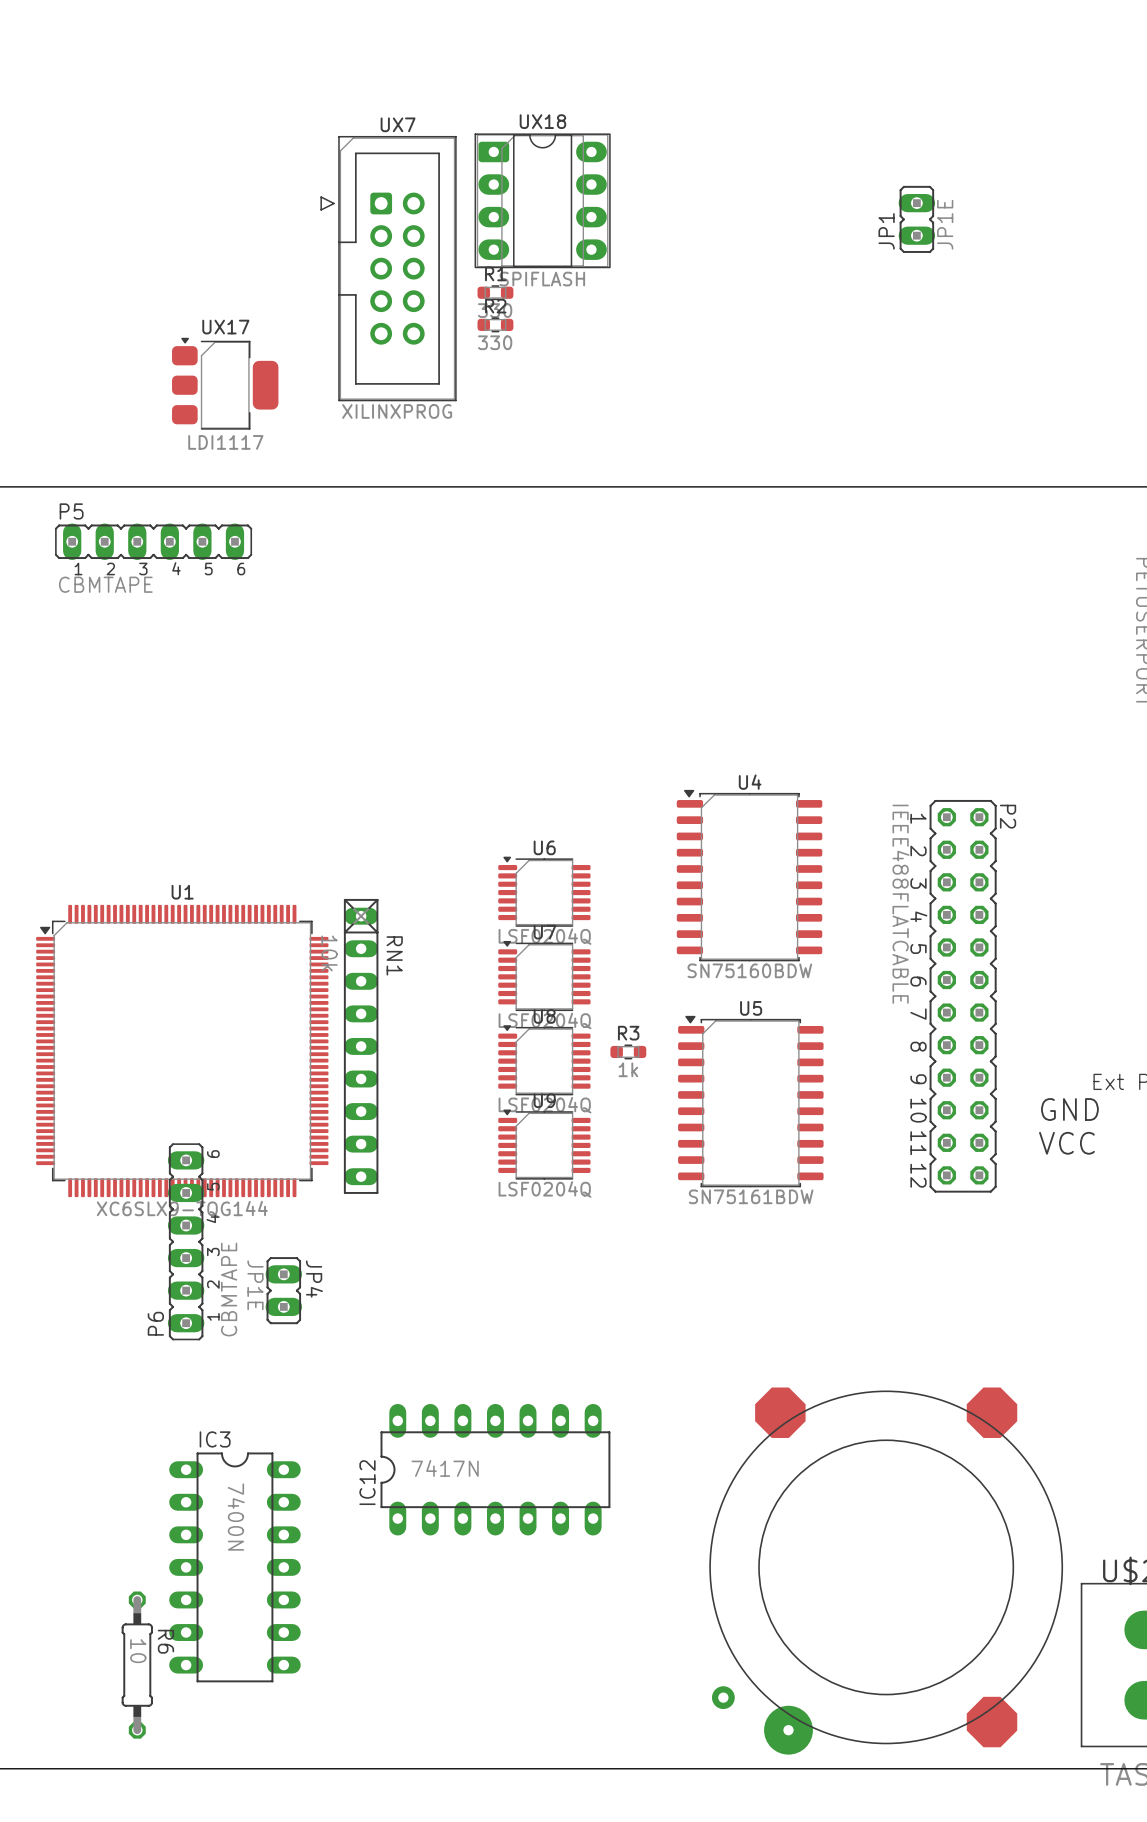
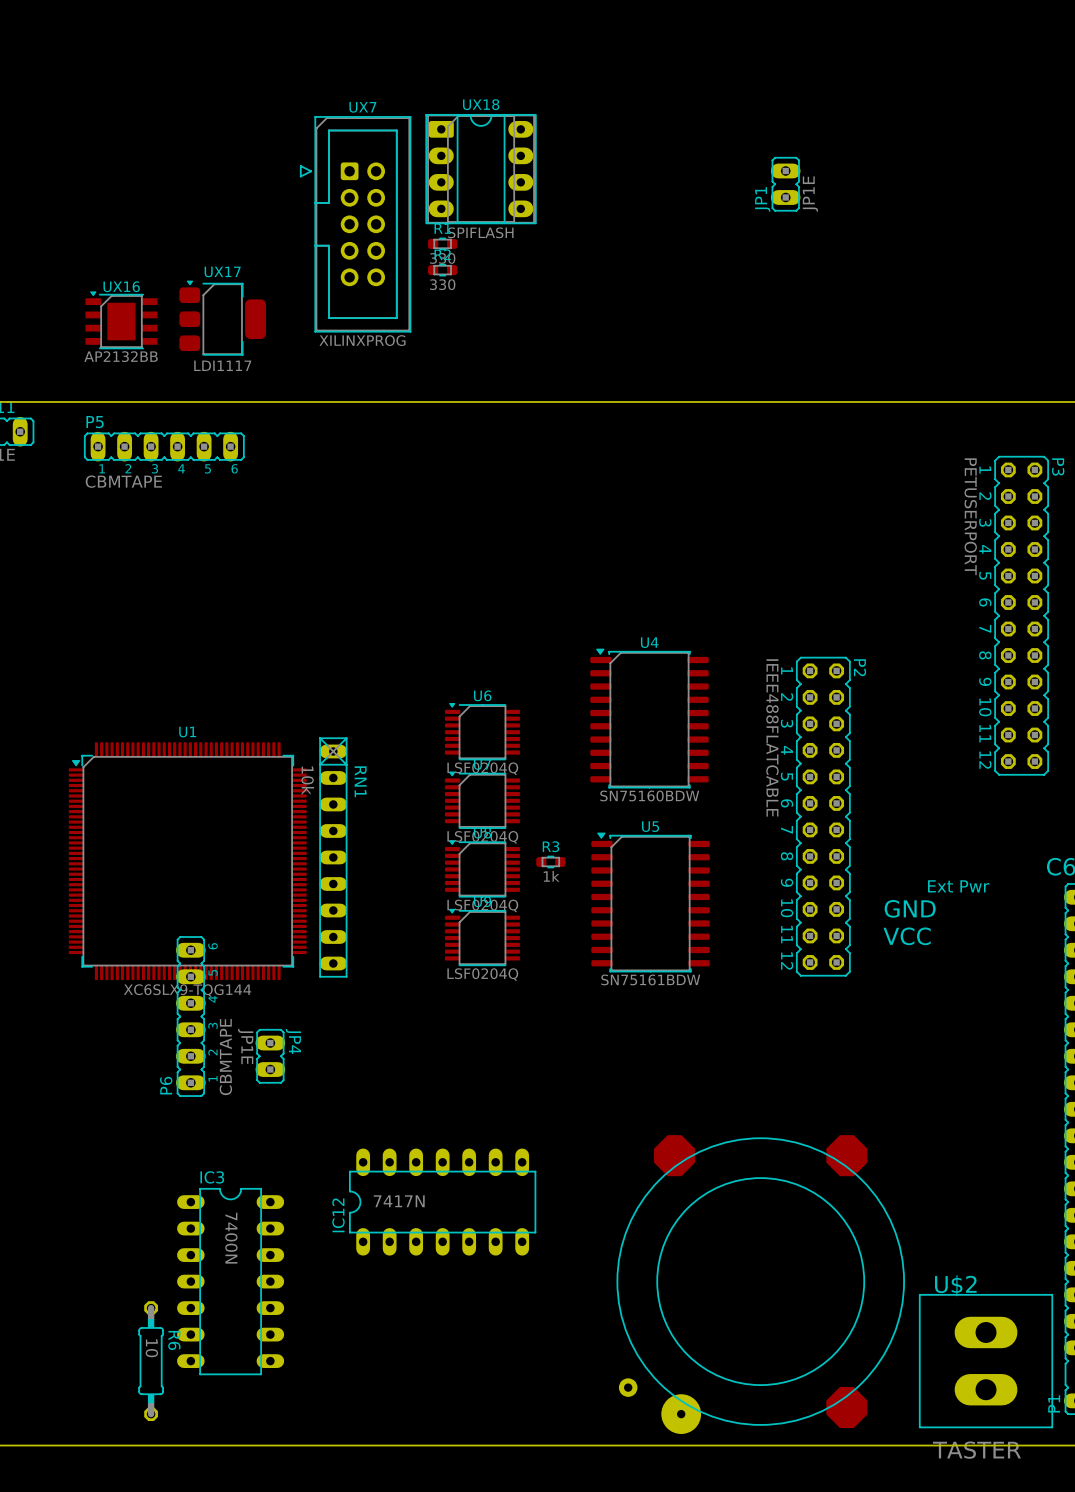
UX16: none -> AP2132BB (121, 320)

